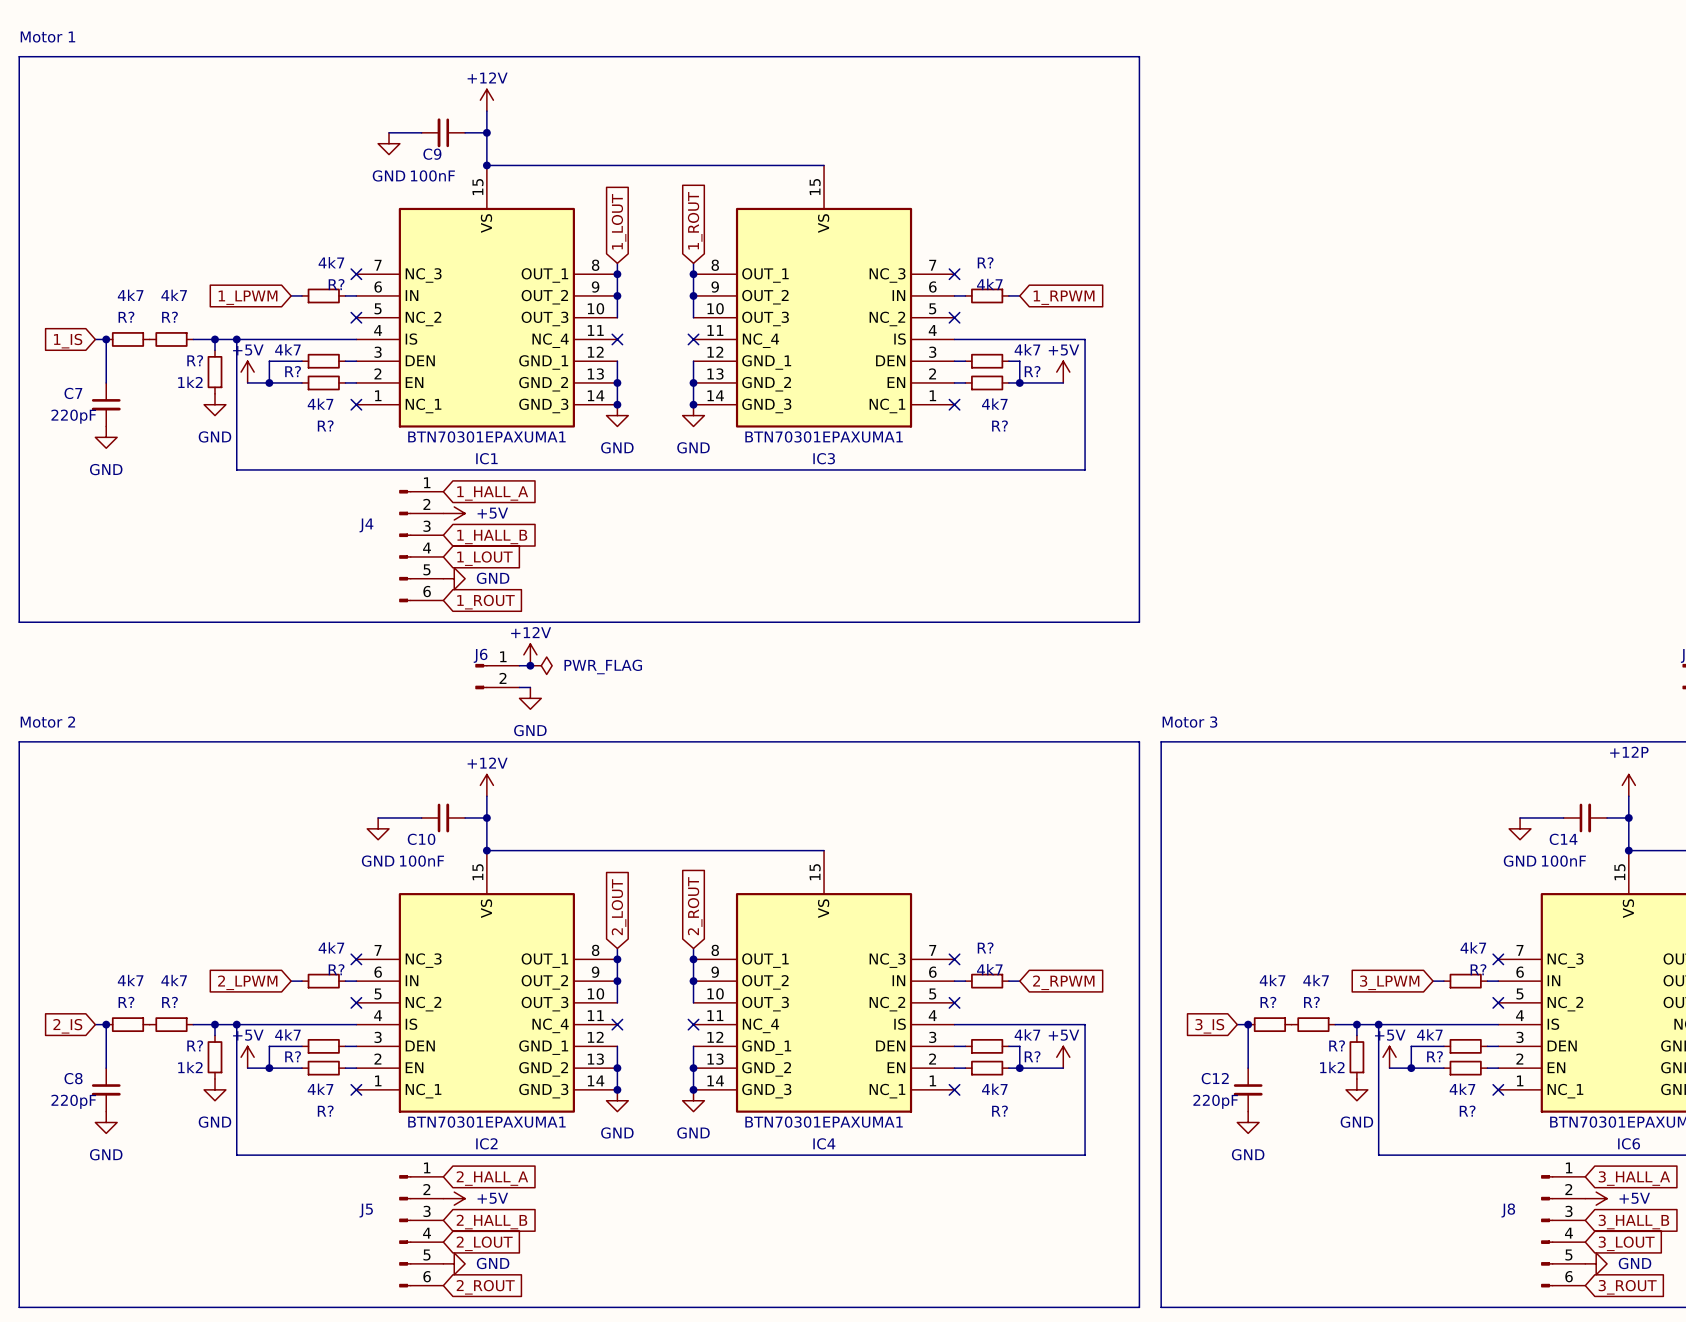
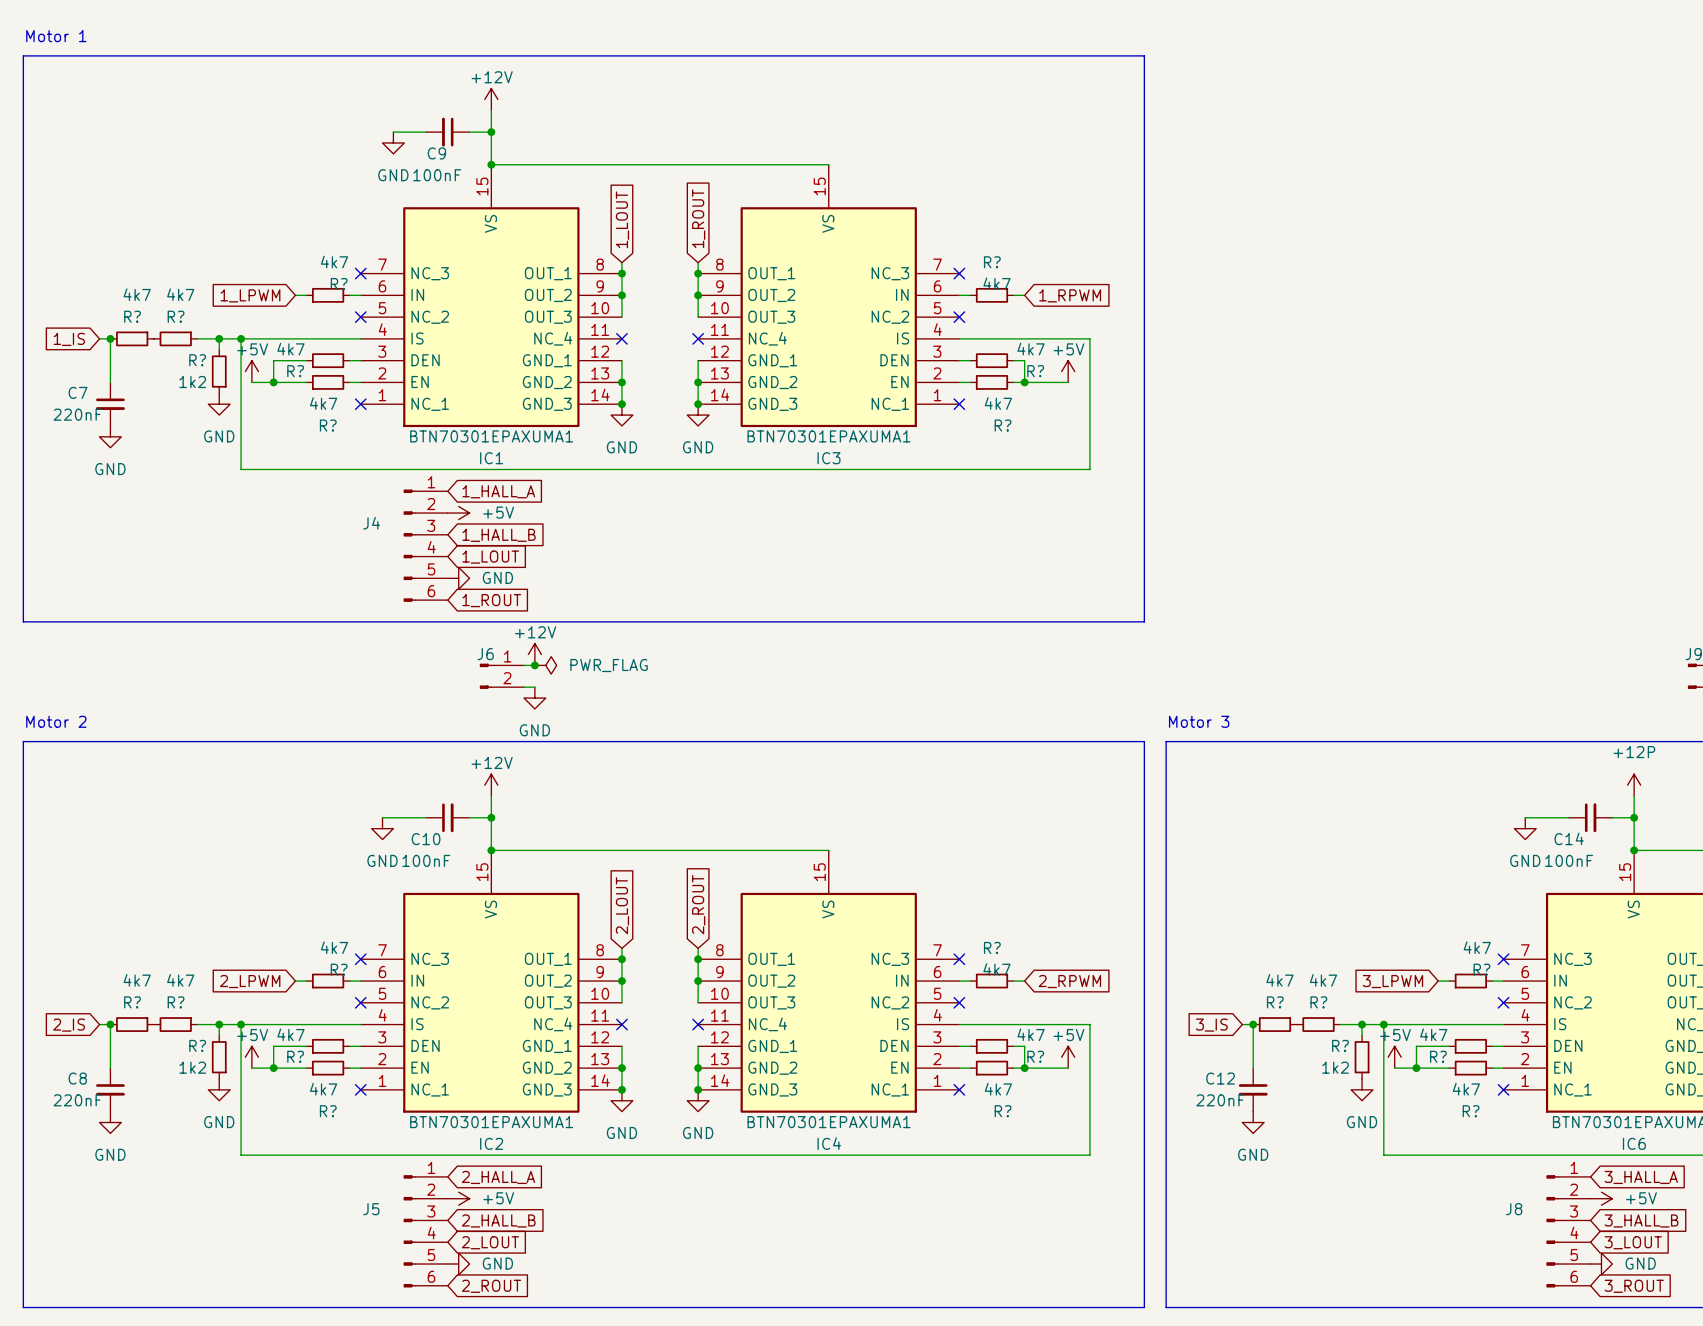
C7 value: 220pF (73, 416) -> 220nF (77, 414)
C8 value: 220pF (73, 1101) -> 220nF (77, 1100)
C12 value: 220pF (1215, 1101) -> 220nF (1220, 1100)

